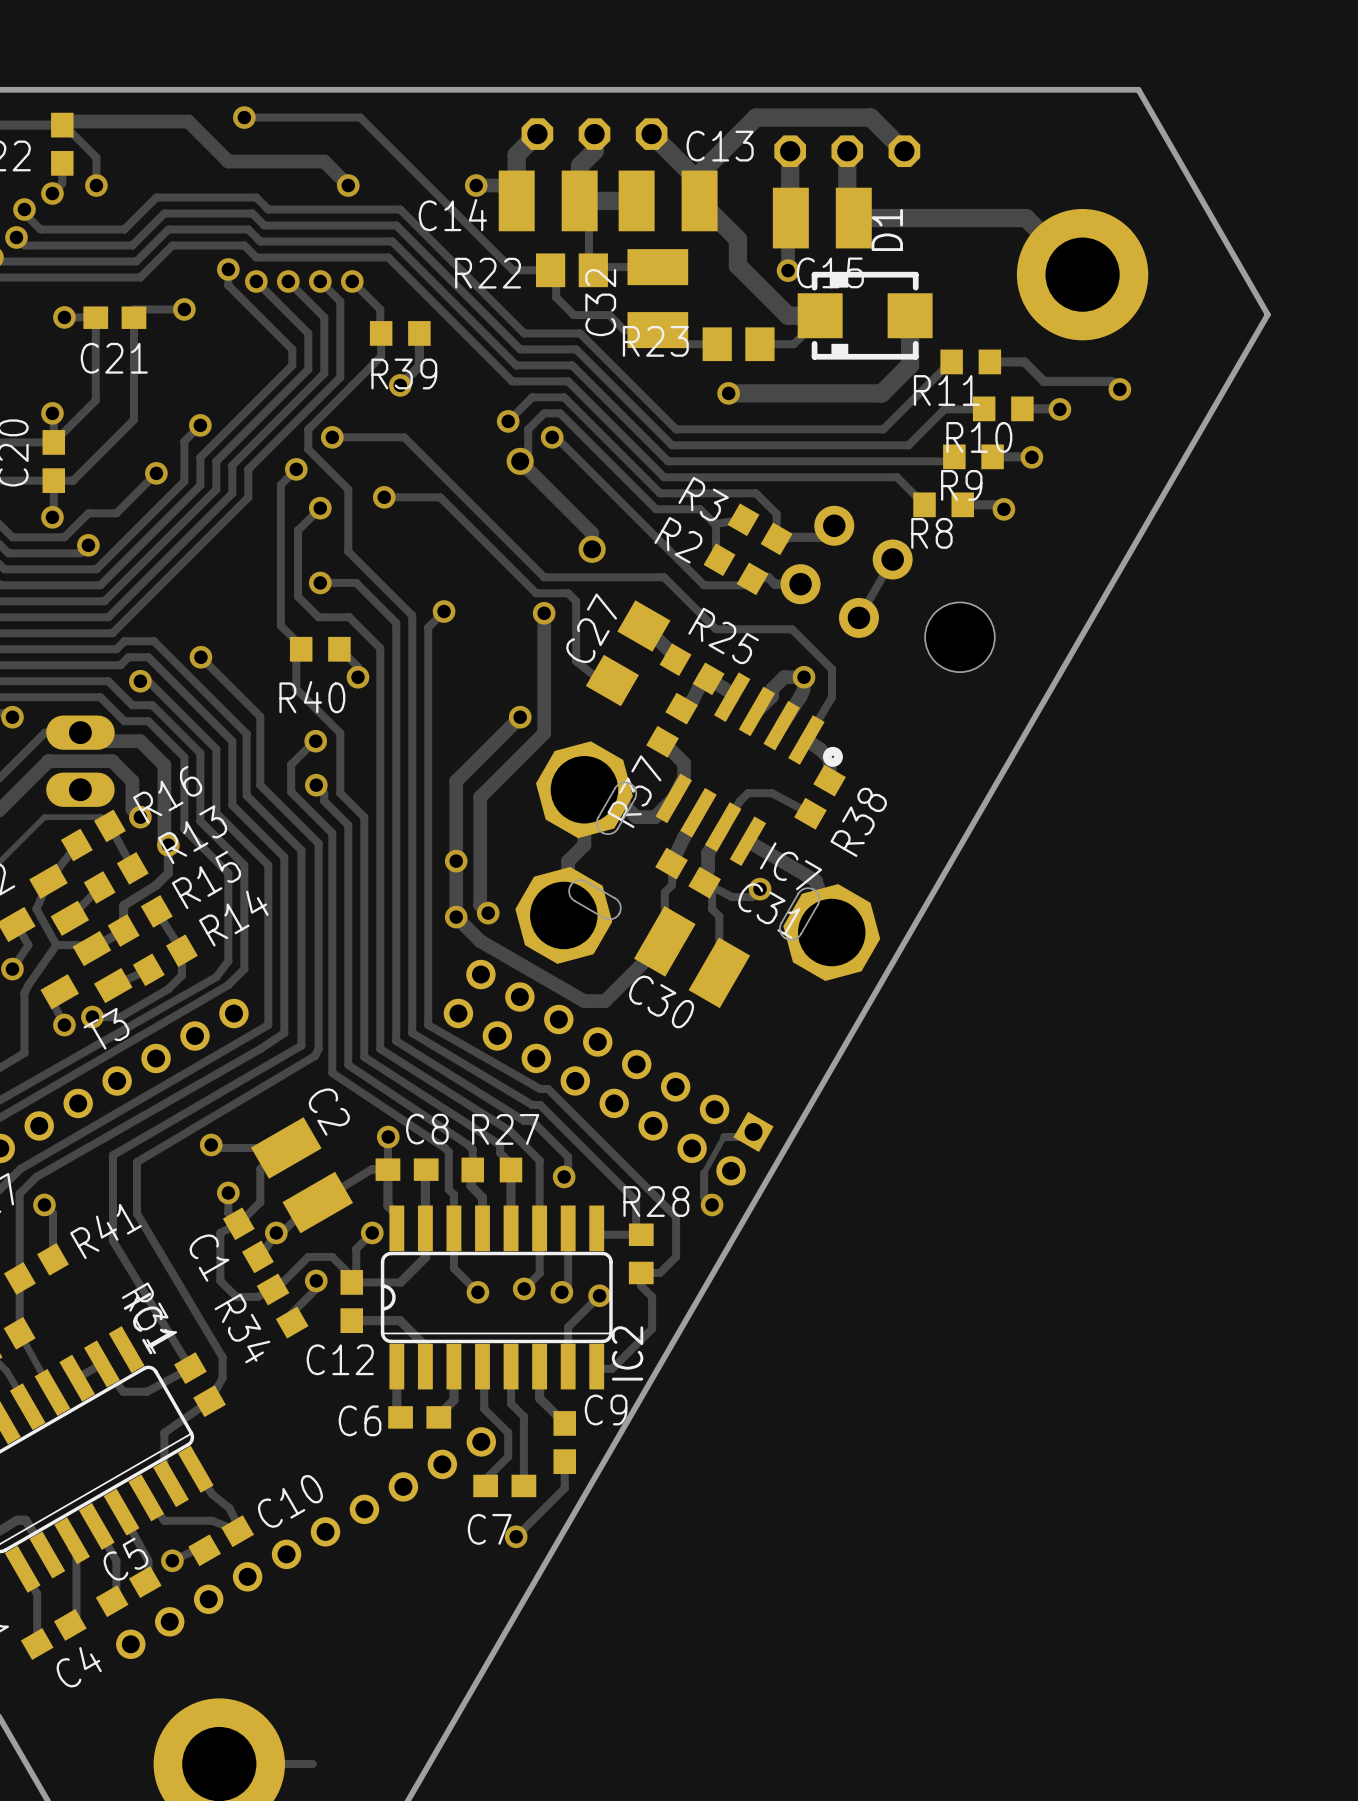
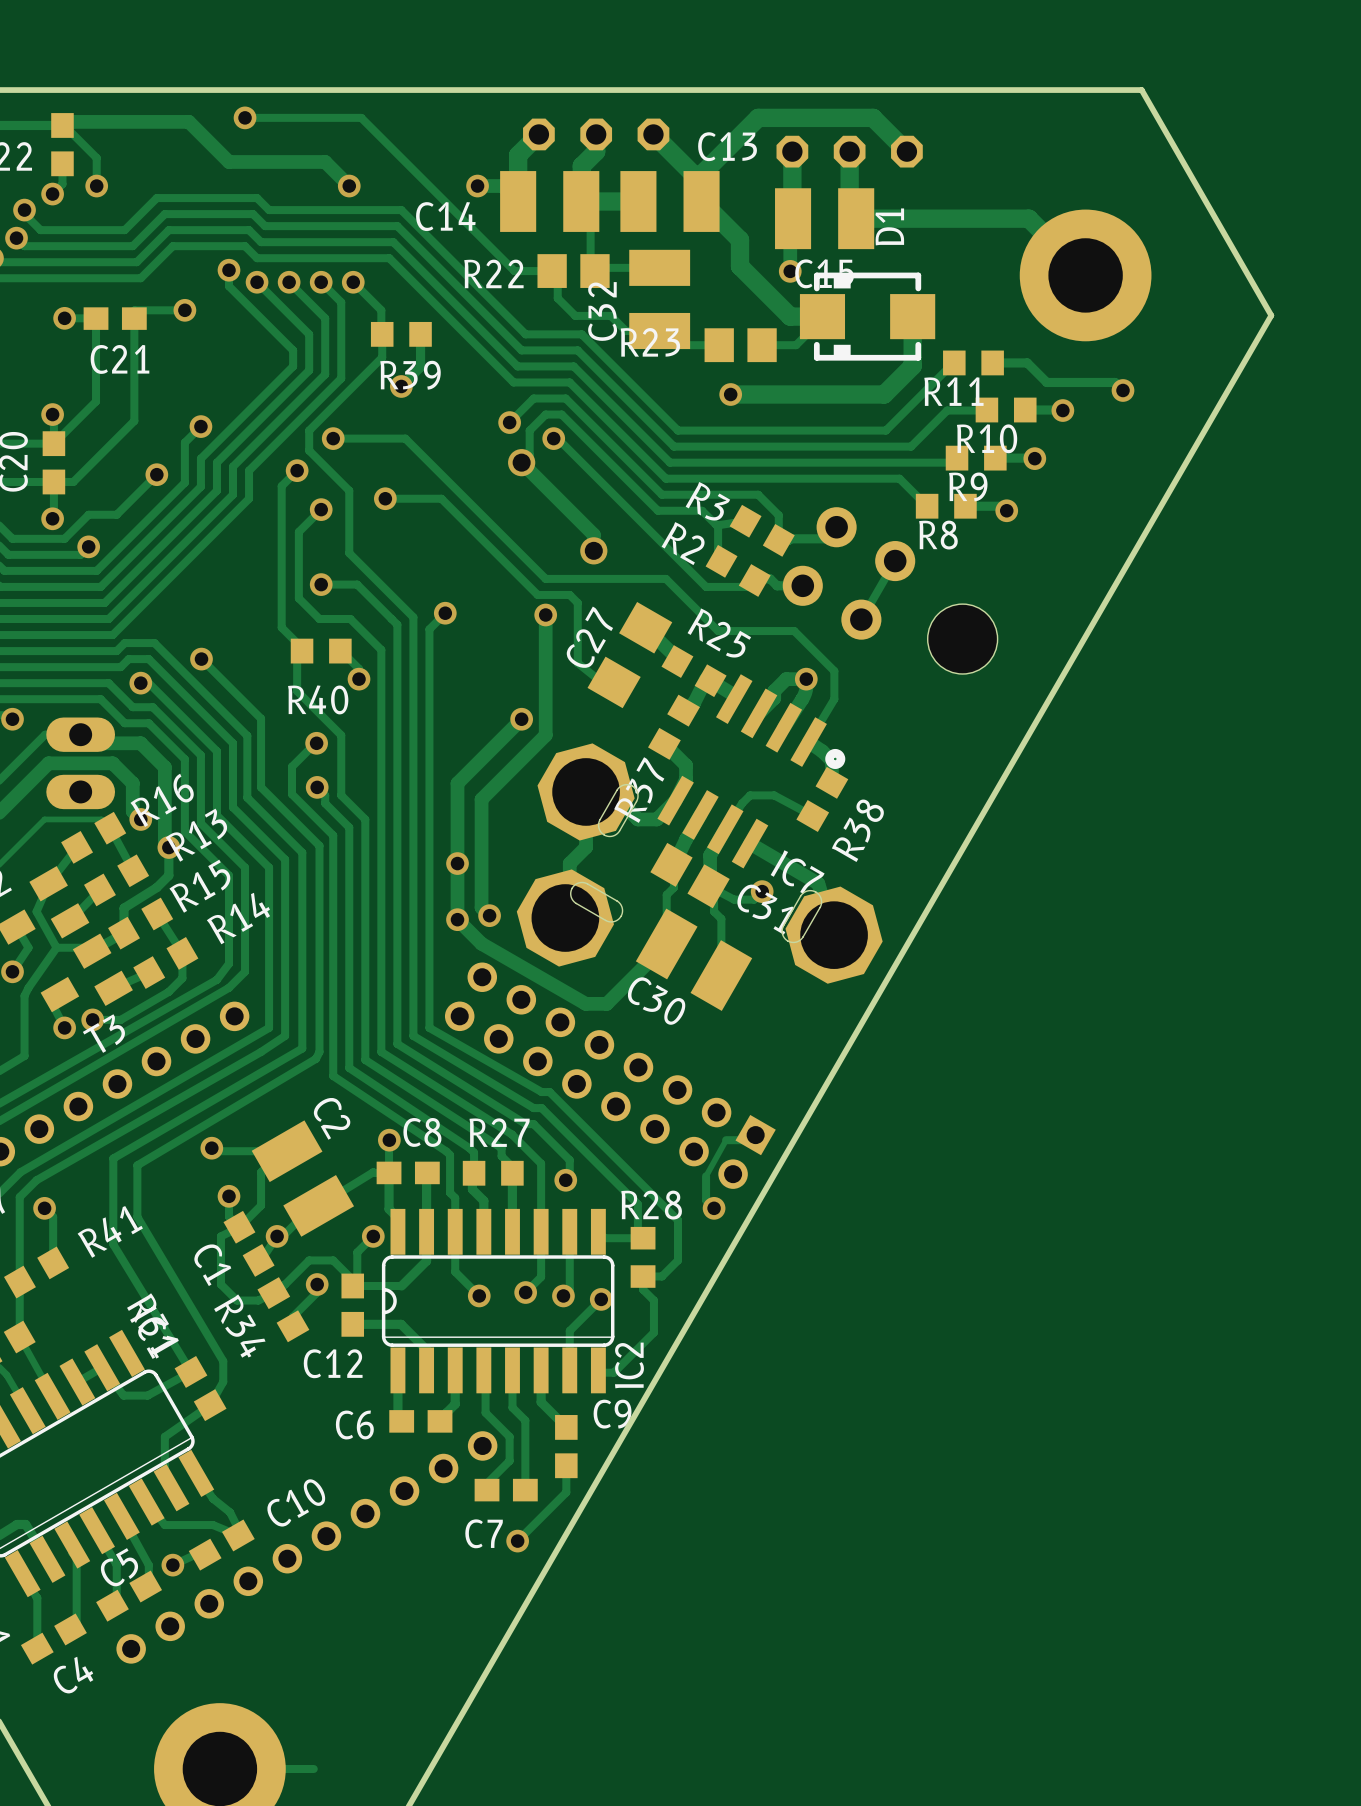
C31 footprint: [655, 847, 721, 899] -> [650, 842, 730, 909]

